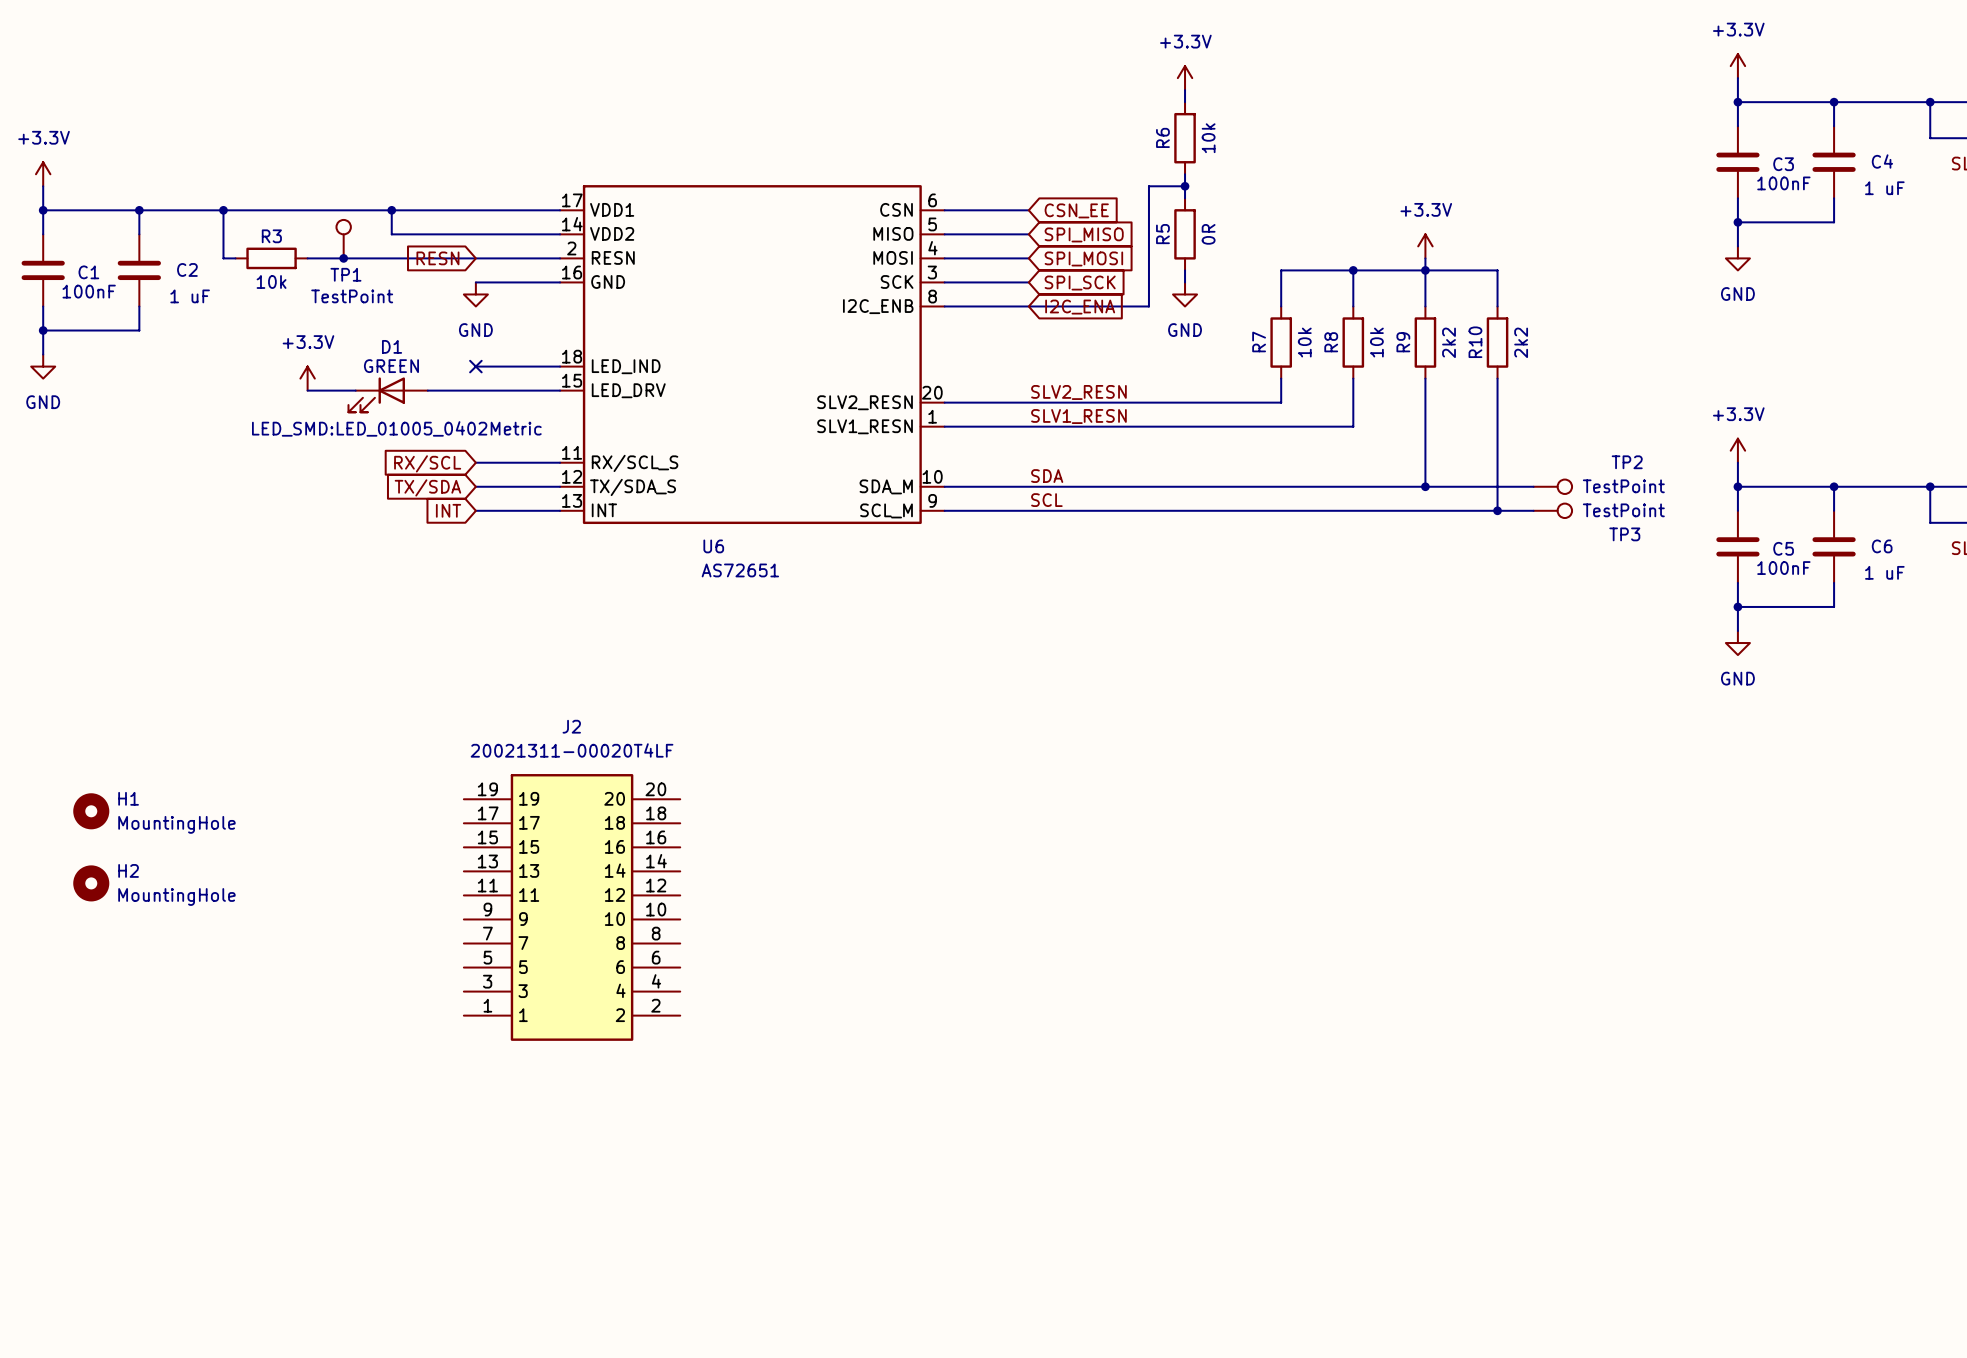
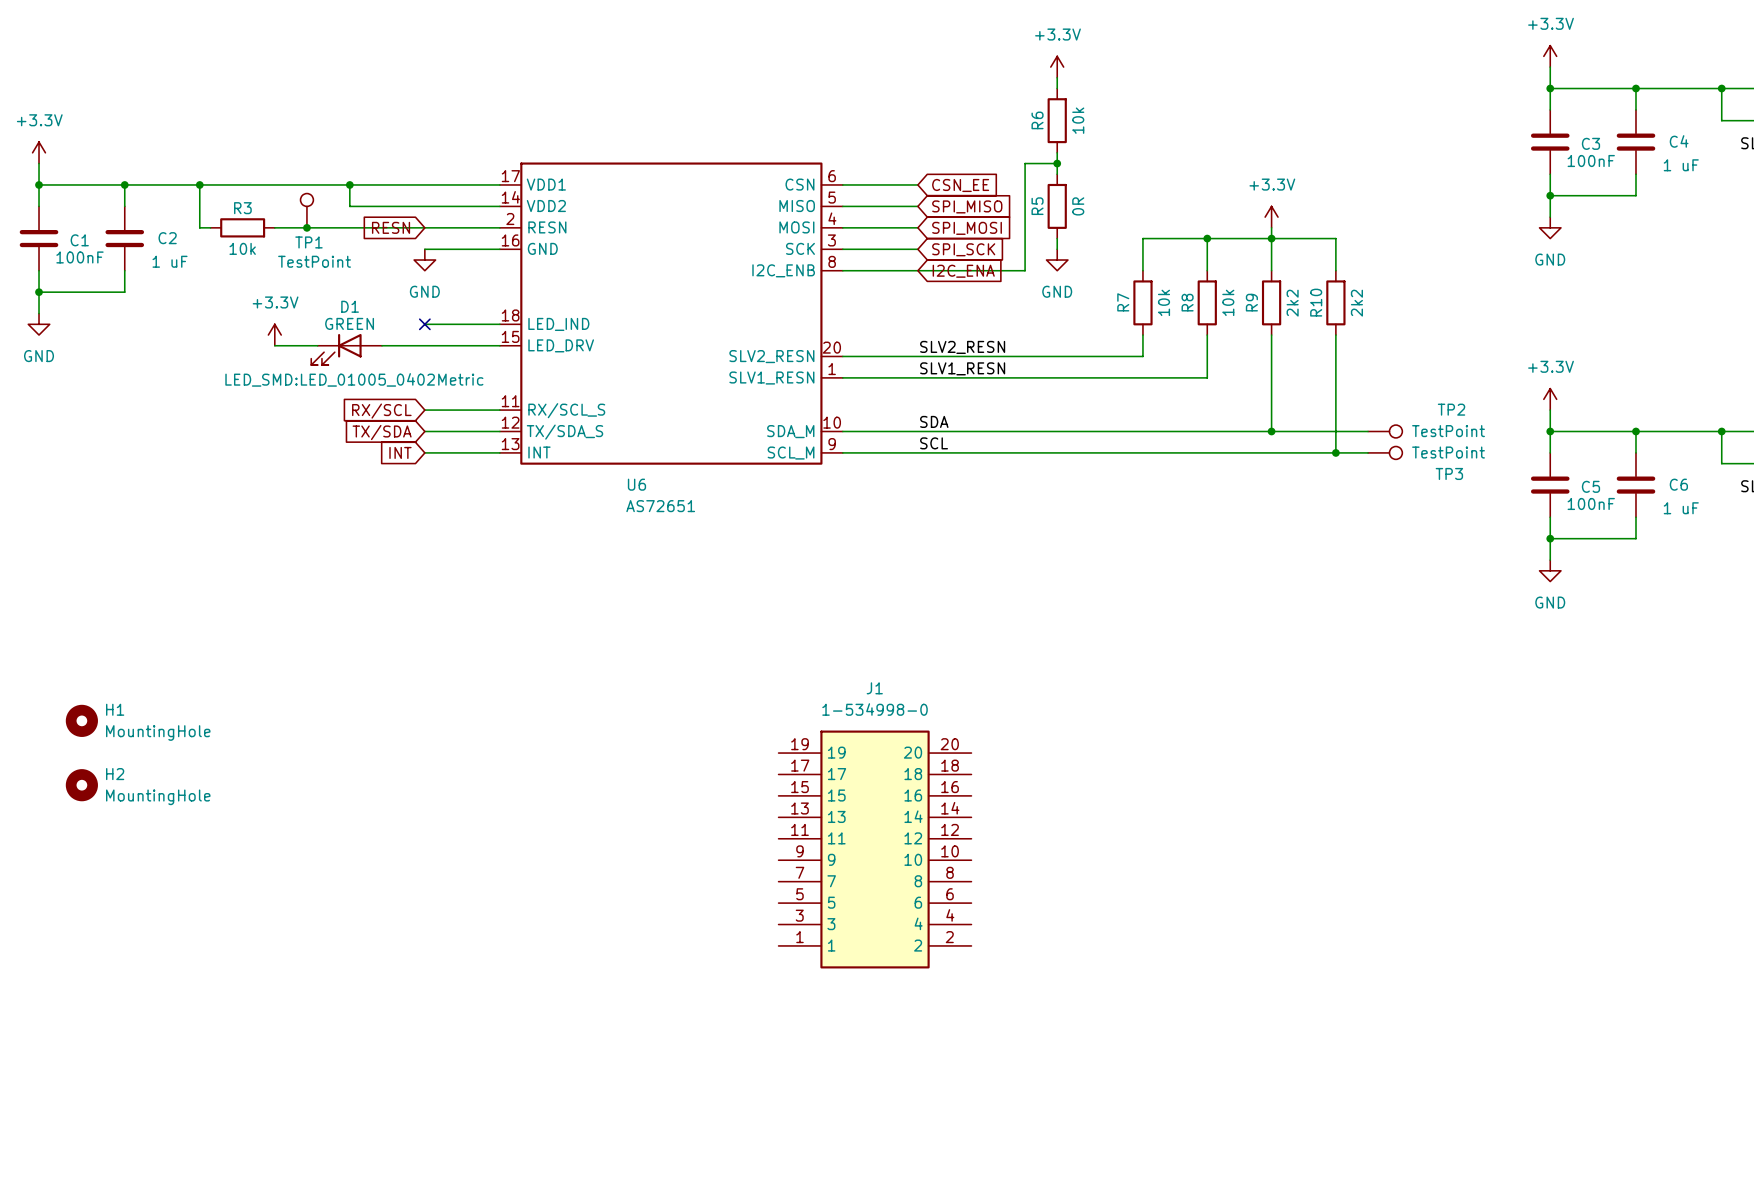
J2: 20021311-00020T4LF (572, 907) -> none
J1: none -> 1-534998-0 (875, 849)

